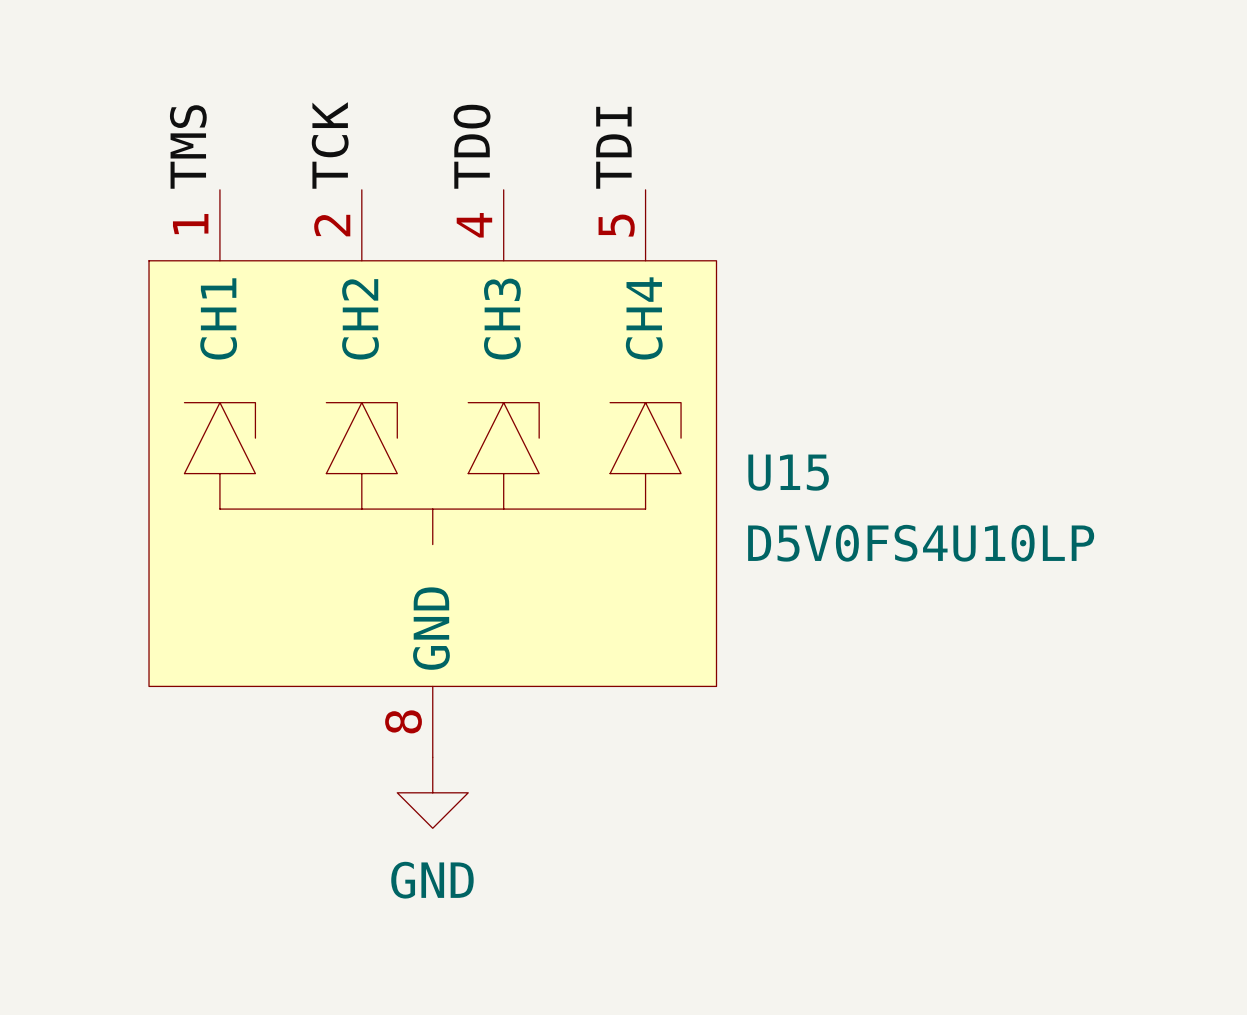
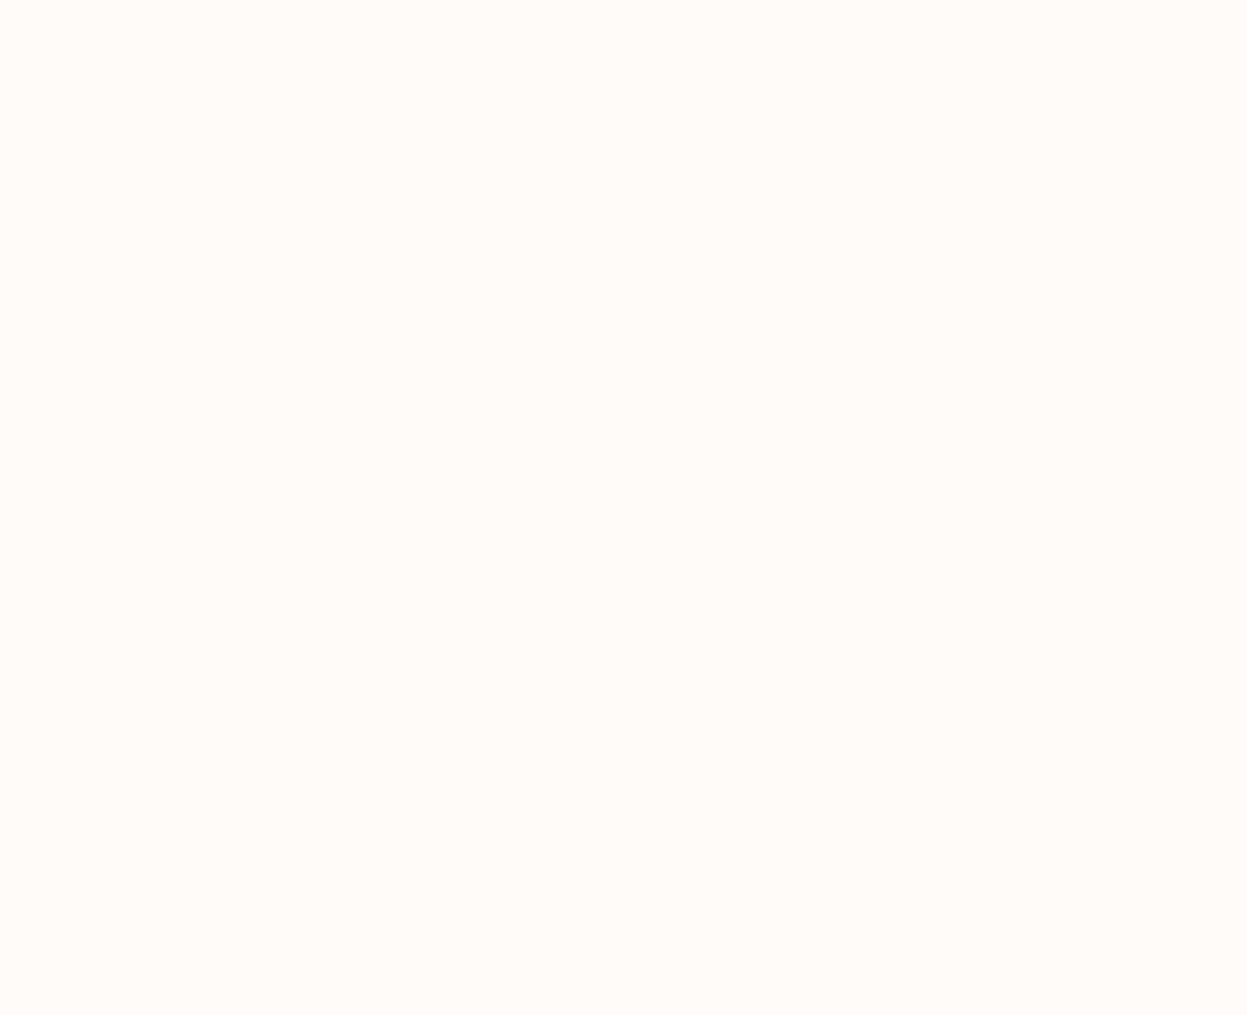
label: TCK (330, 145) -> none
label: TMS (188, 146) -> none
label: TDO (472, 146) -> none
label: TDI (613, 147) -> none
U15: D5V0FS4U10LP (432, 473) -> none
power symbol: GND (432, 792) -> none

